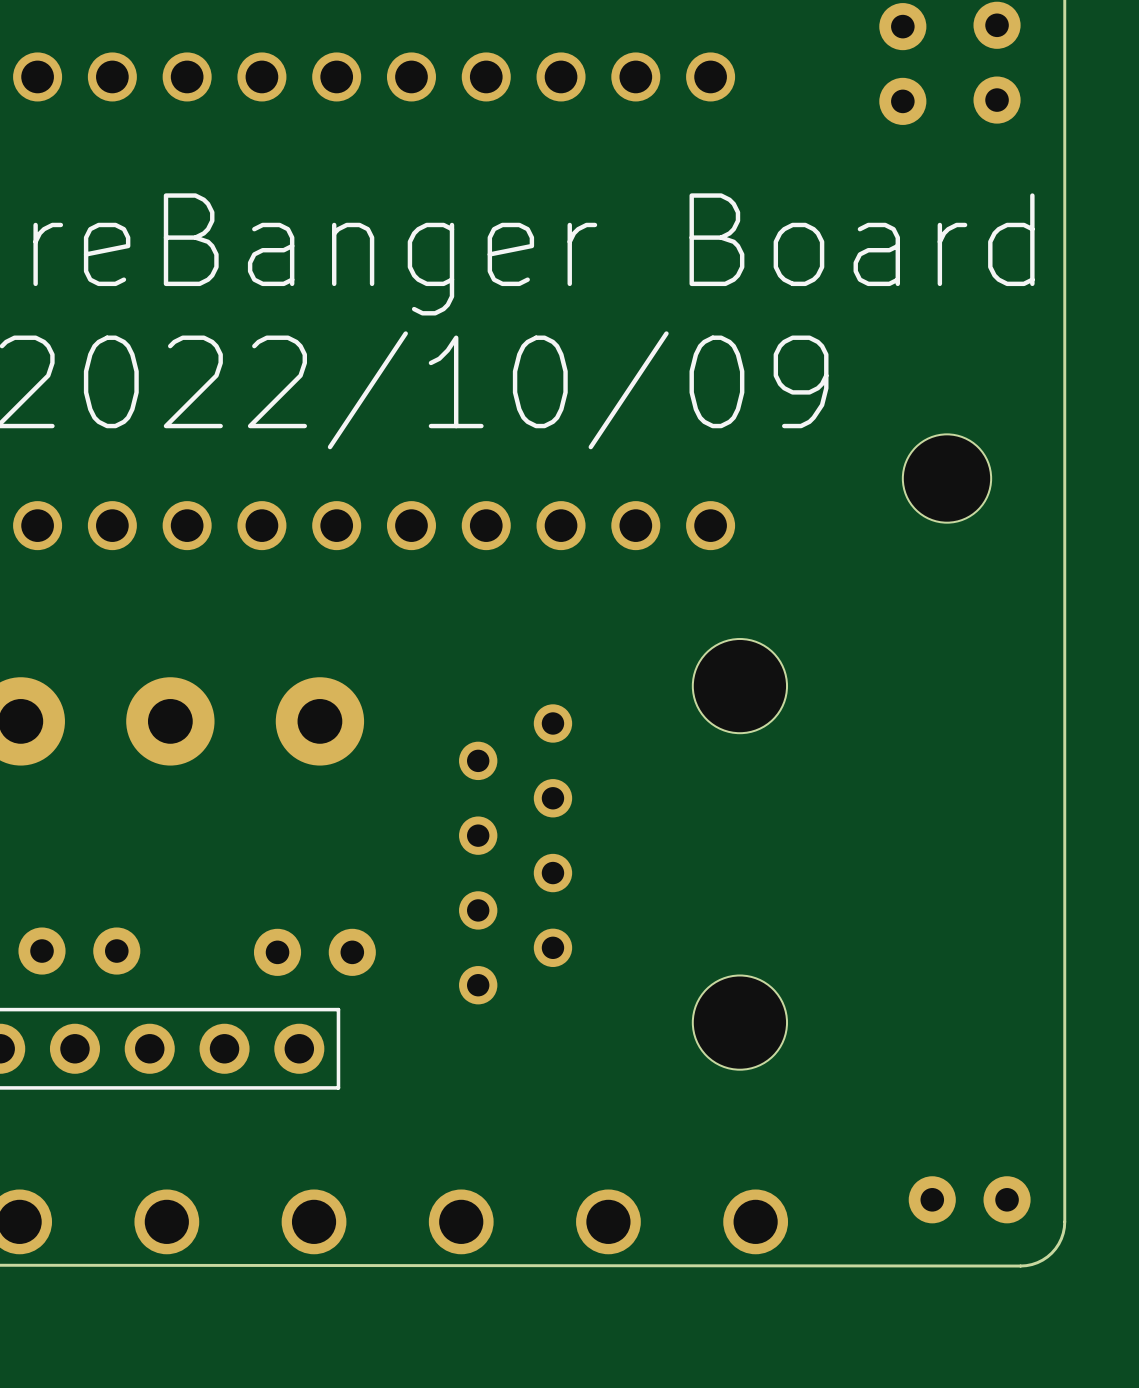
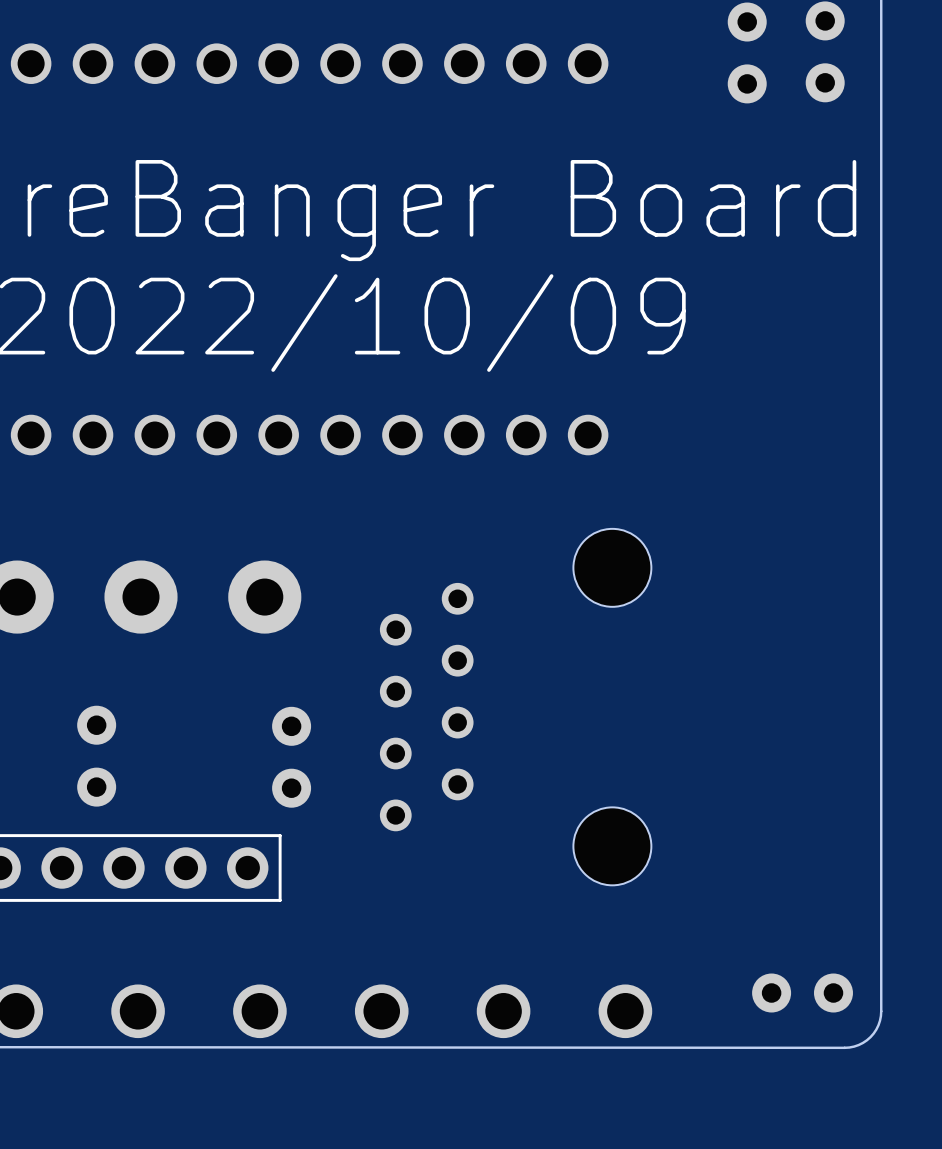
part: (947, 478) -> none
part rotation: 0° (79, 951) -> 90° clockwise (96, 756)
part rotation: 0° (314, 952) -> 90° clockwise (291, 757)

